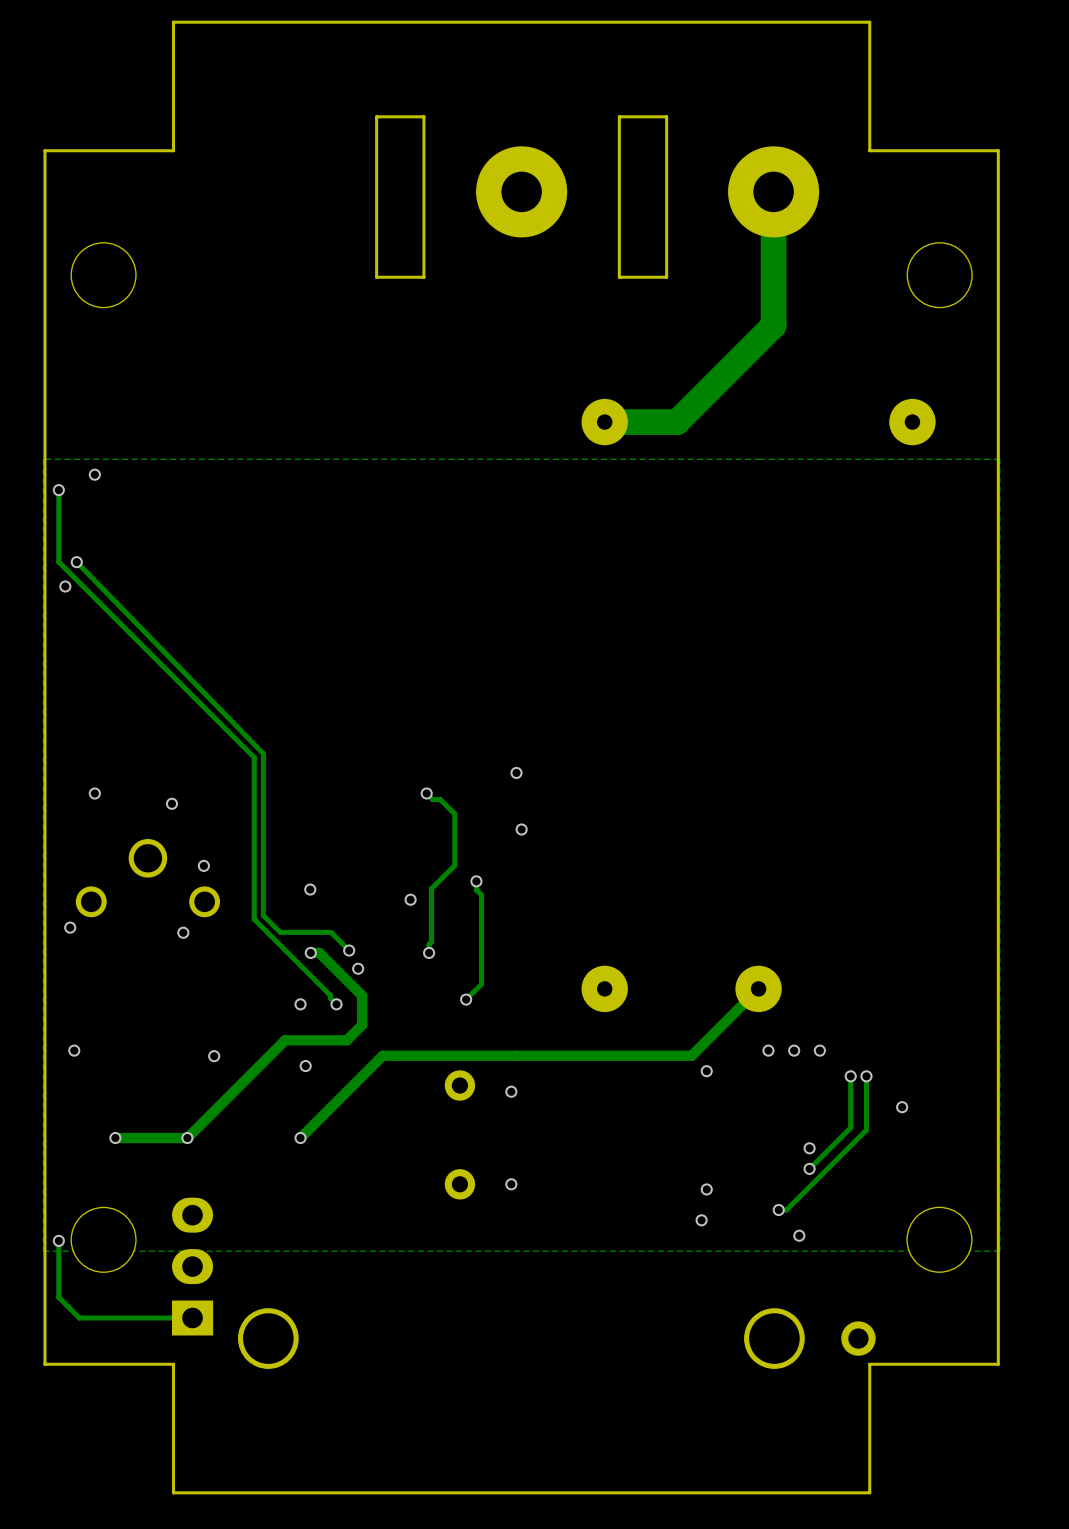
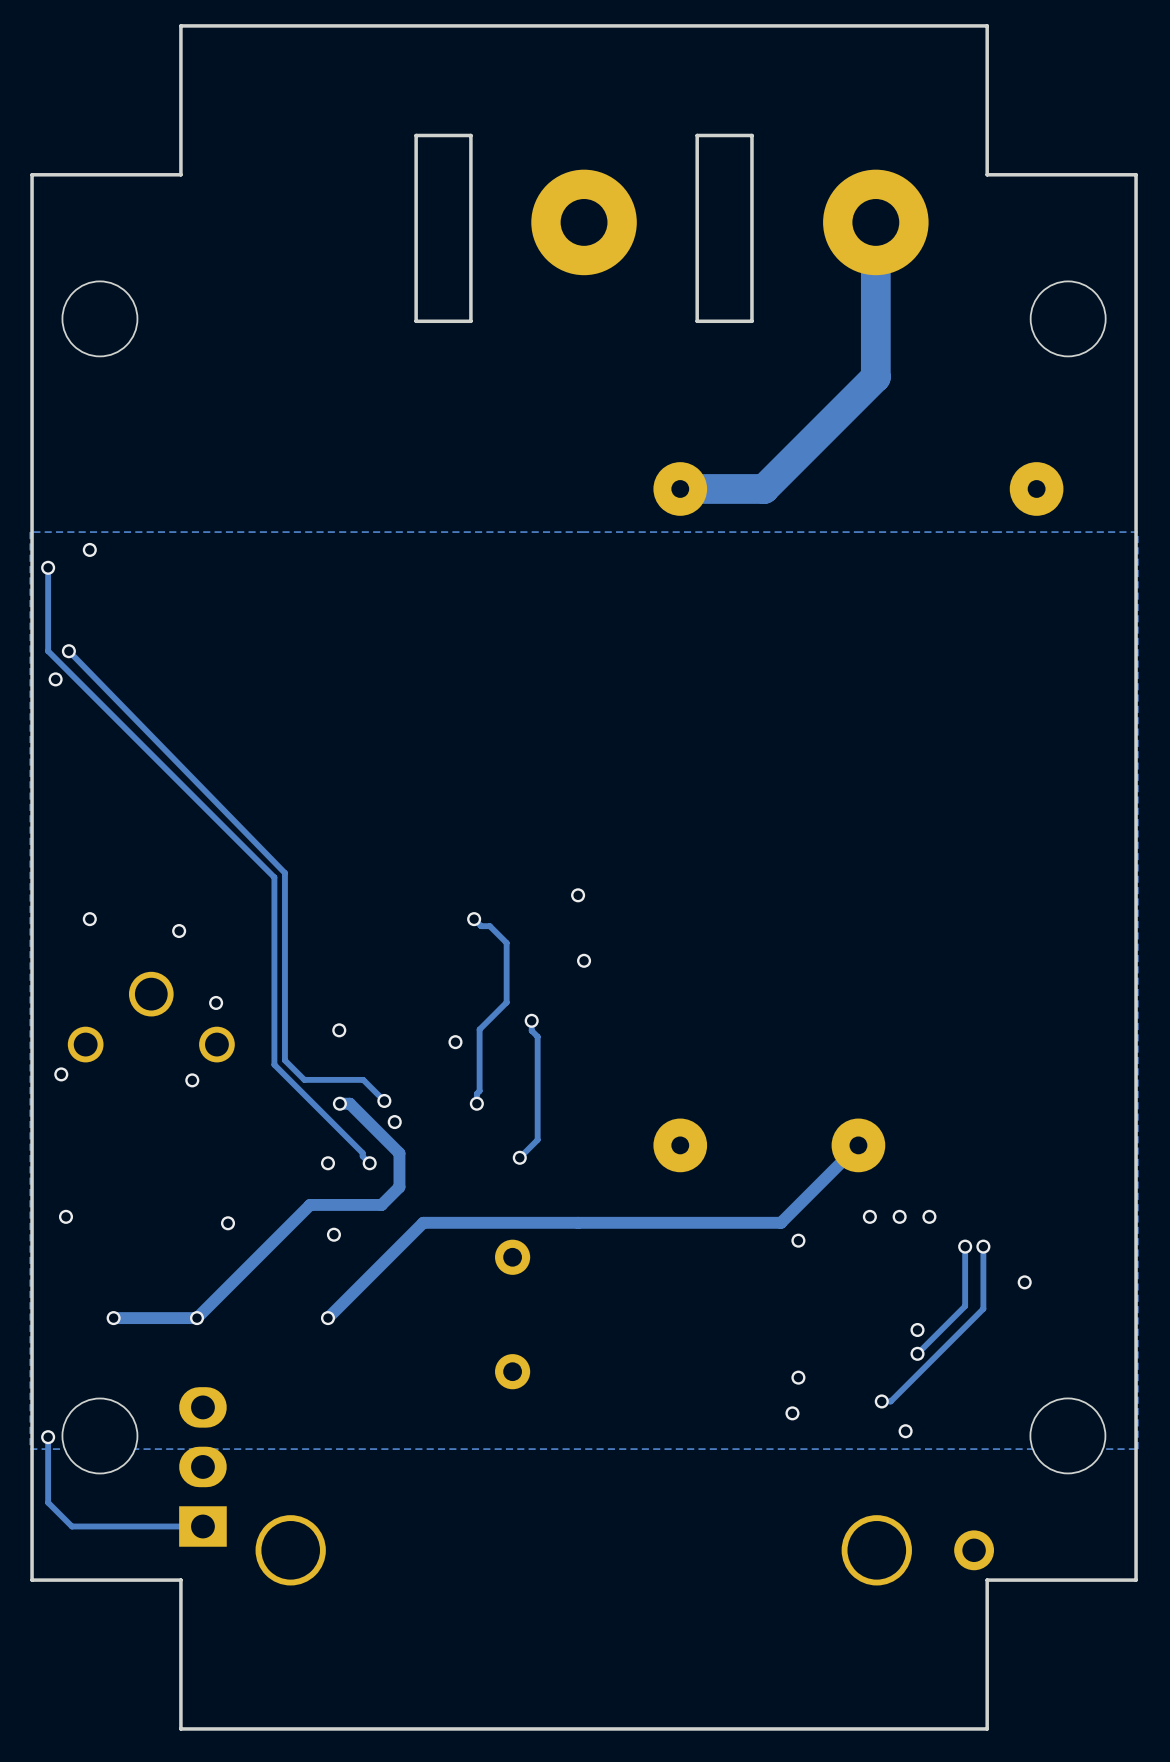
via: (511, 1091) -> none
via: (511, 1184) -> none

